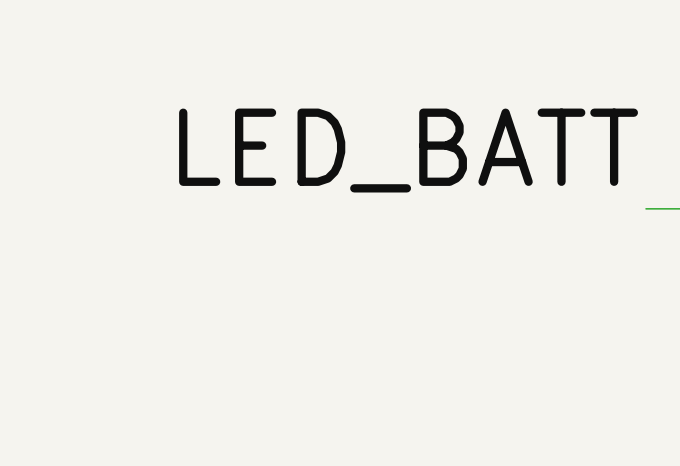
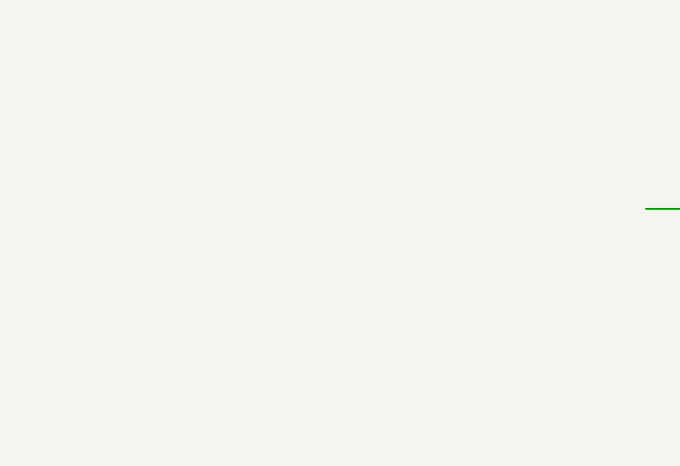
label: LED_BATT (408, 150) -> none

